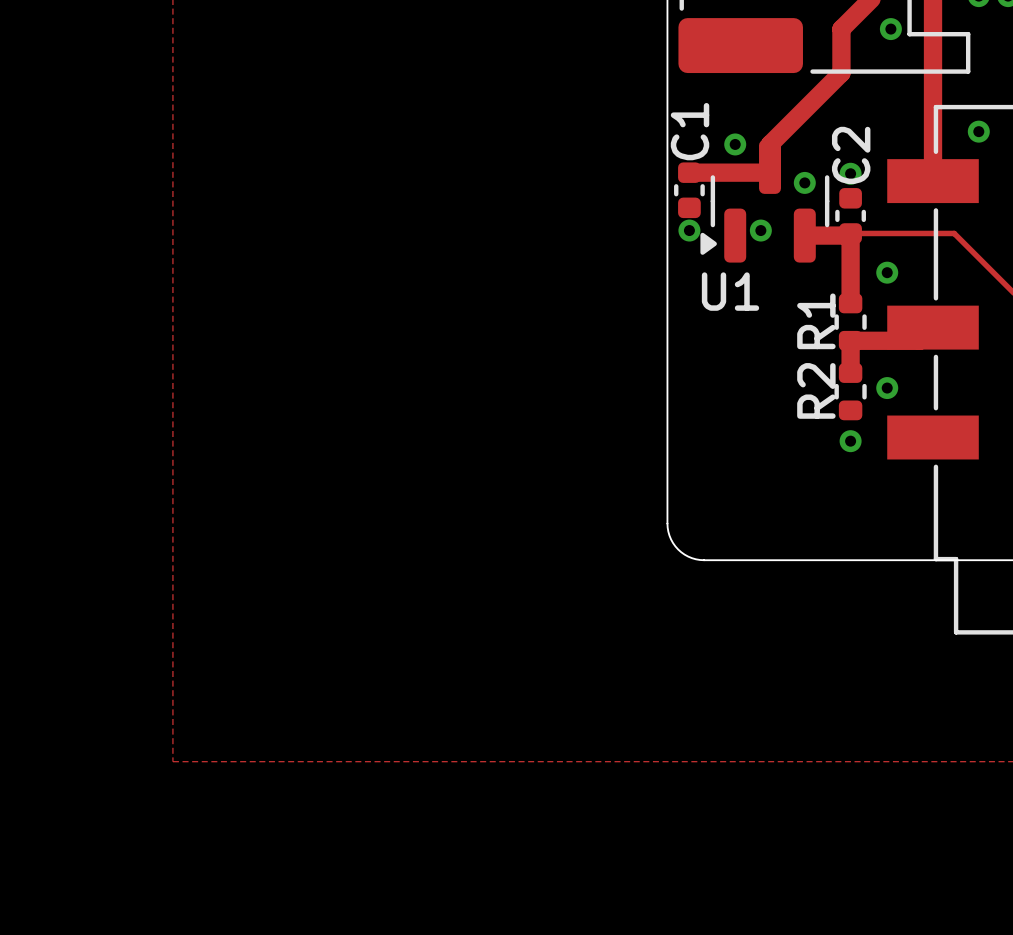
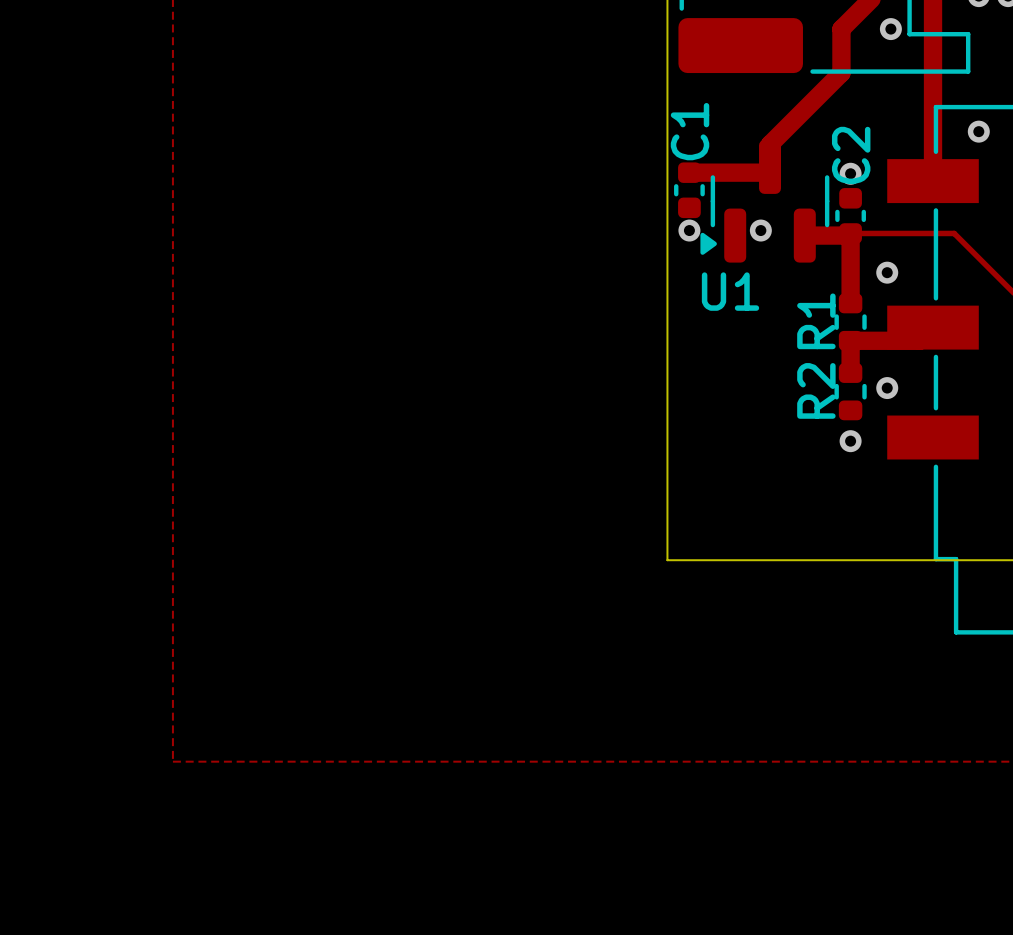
via: (735, 144) -> none
via: (804, 182) -> none
board edge: (667, 523) (669, 535) (678, 549) (691, 558) (704, 560) -> (667, 523) (667, 560) (704, 560)

